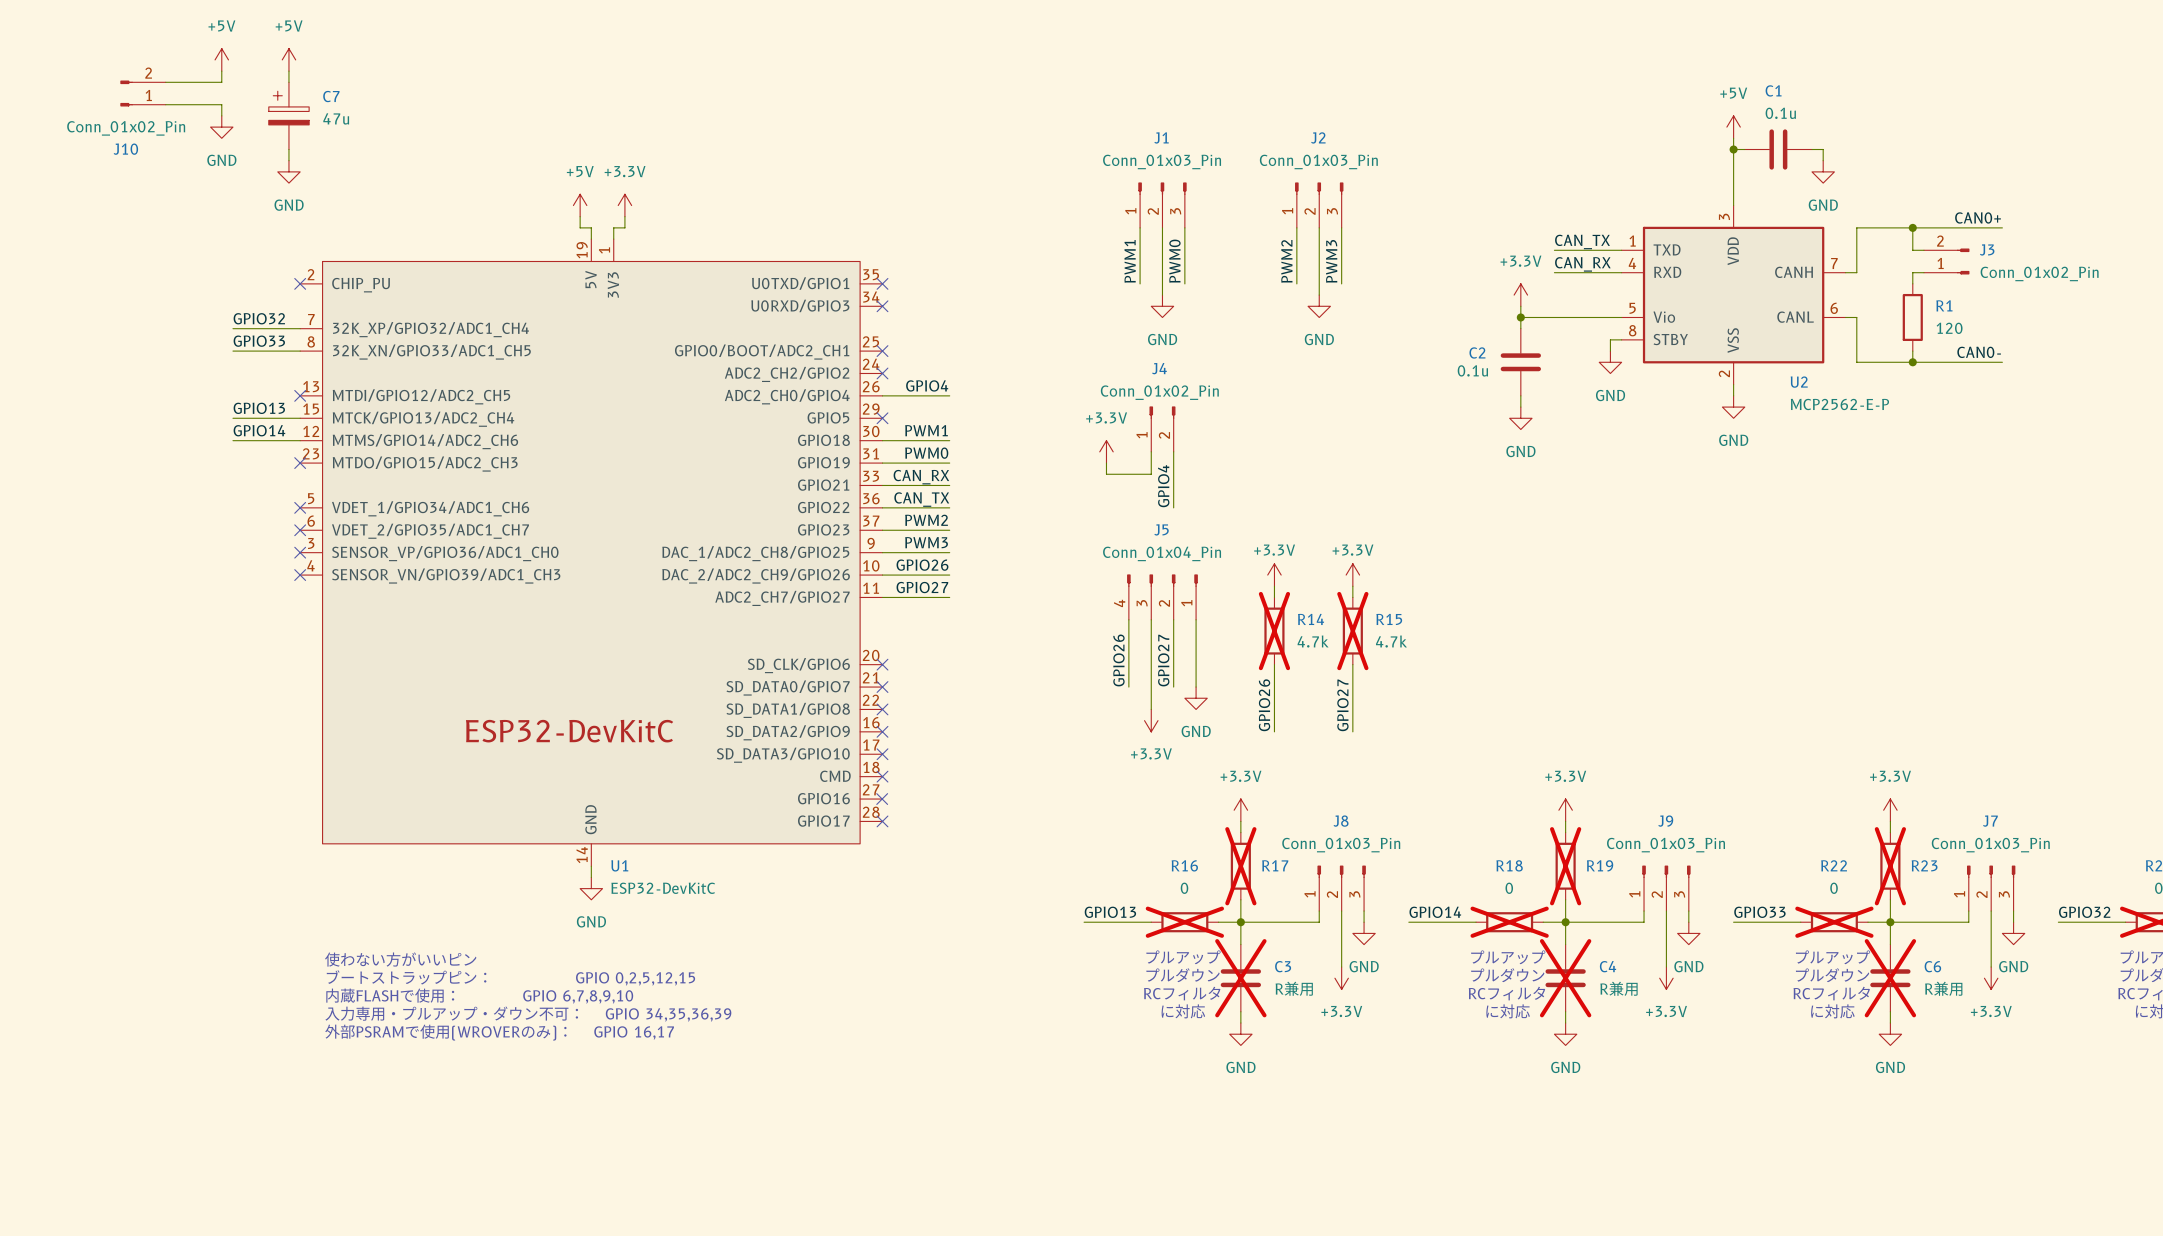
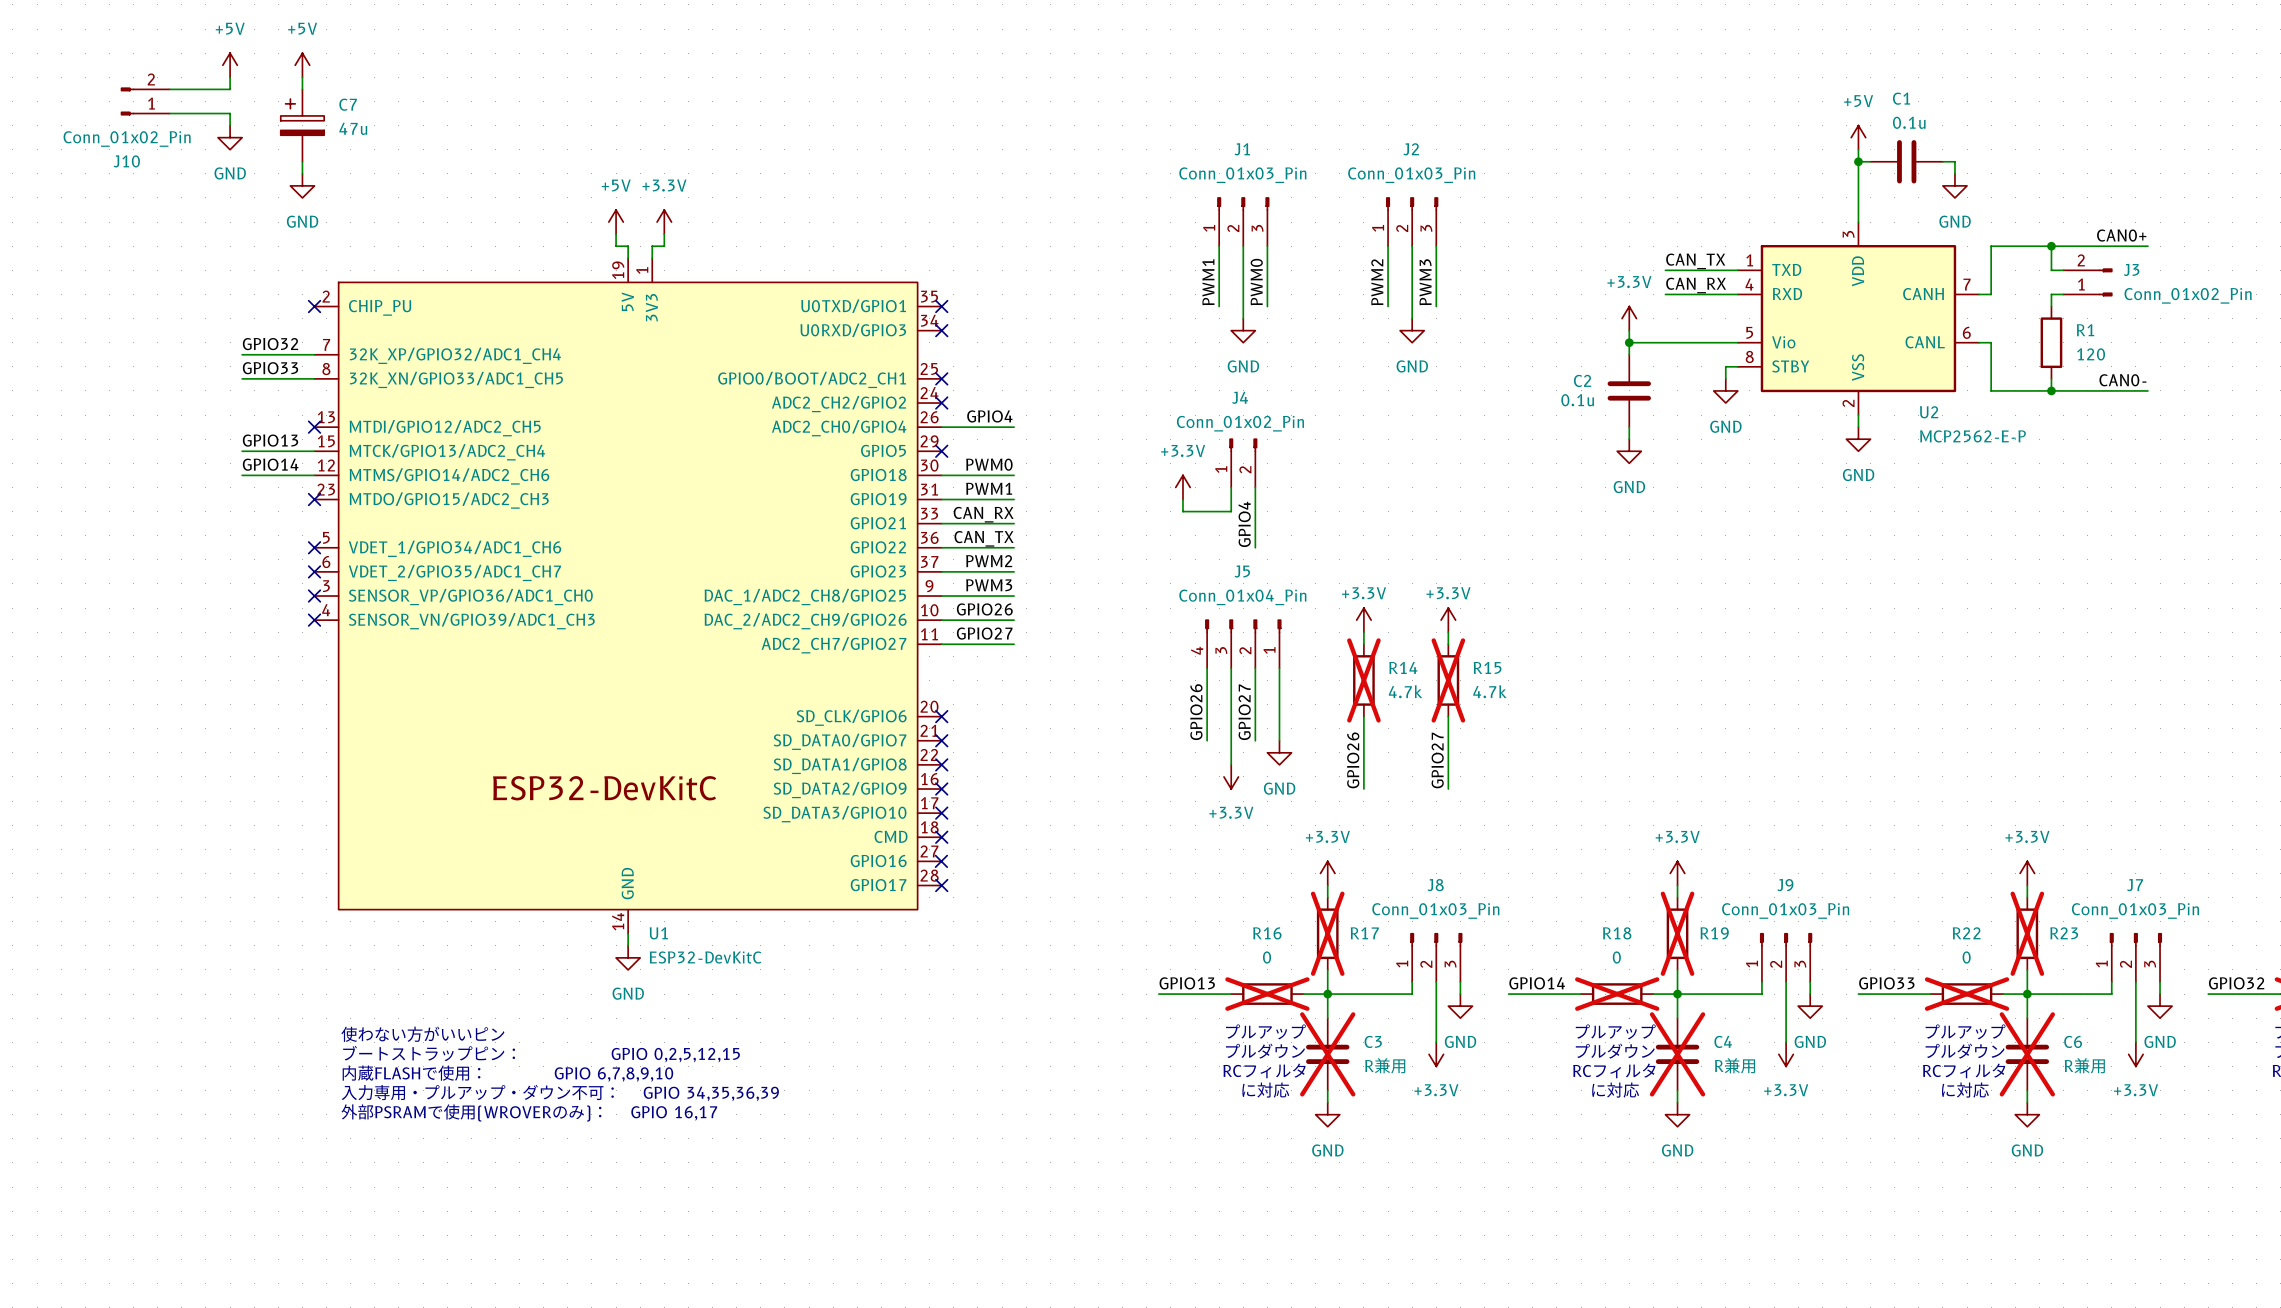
label: PWM1 (926, 430) -> PWM0 (989, 464)
label: PWM0 (926, 453) -> PWM1 (989, 488)

